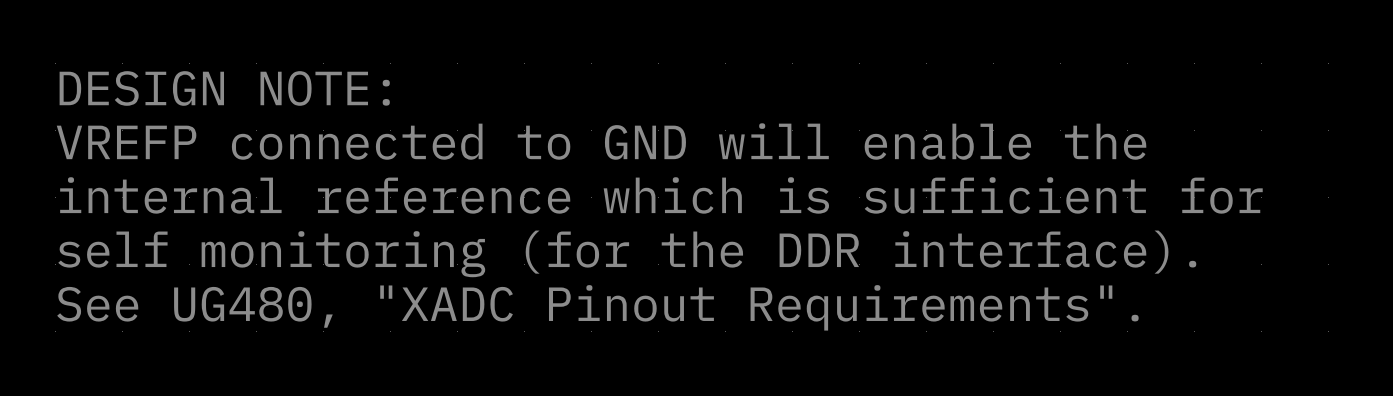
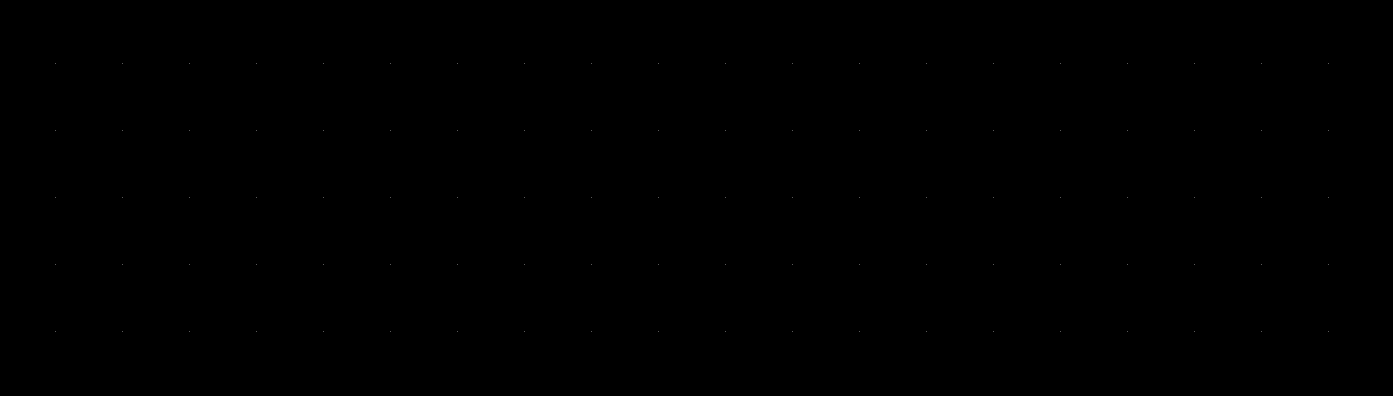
text: DESIGN NOTE: (224, 88) -> none
text: VREFP connected to GND will enable the (601, 141) -> none
text: internal reference which is sufficient for (661, 195) -> none
text: self monitoring (for the DDR interface). (627, 253) -> none
text: See UG480, "XADC Pinout Requirements". (597, 307) -> none

